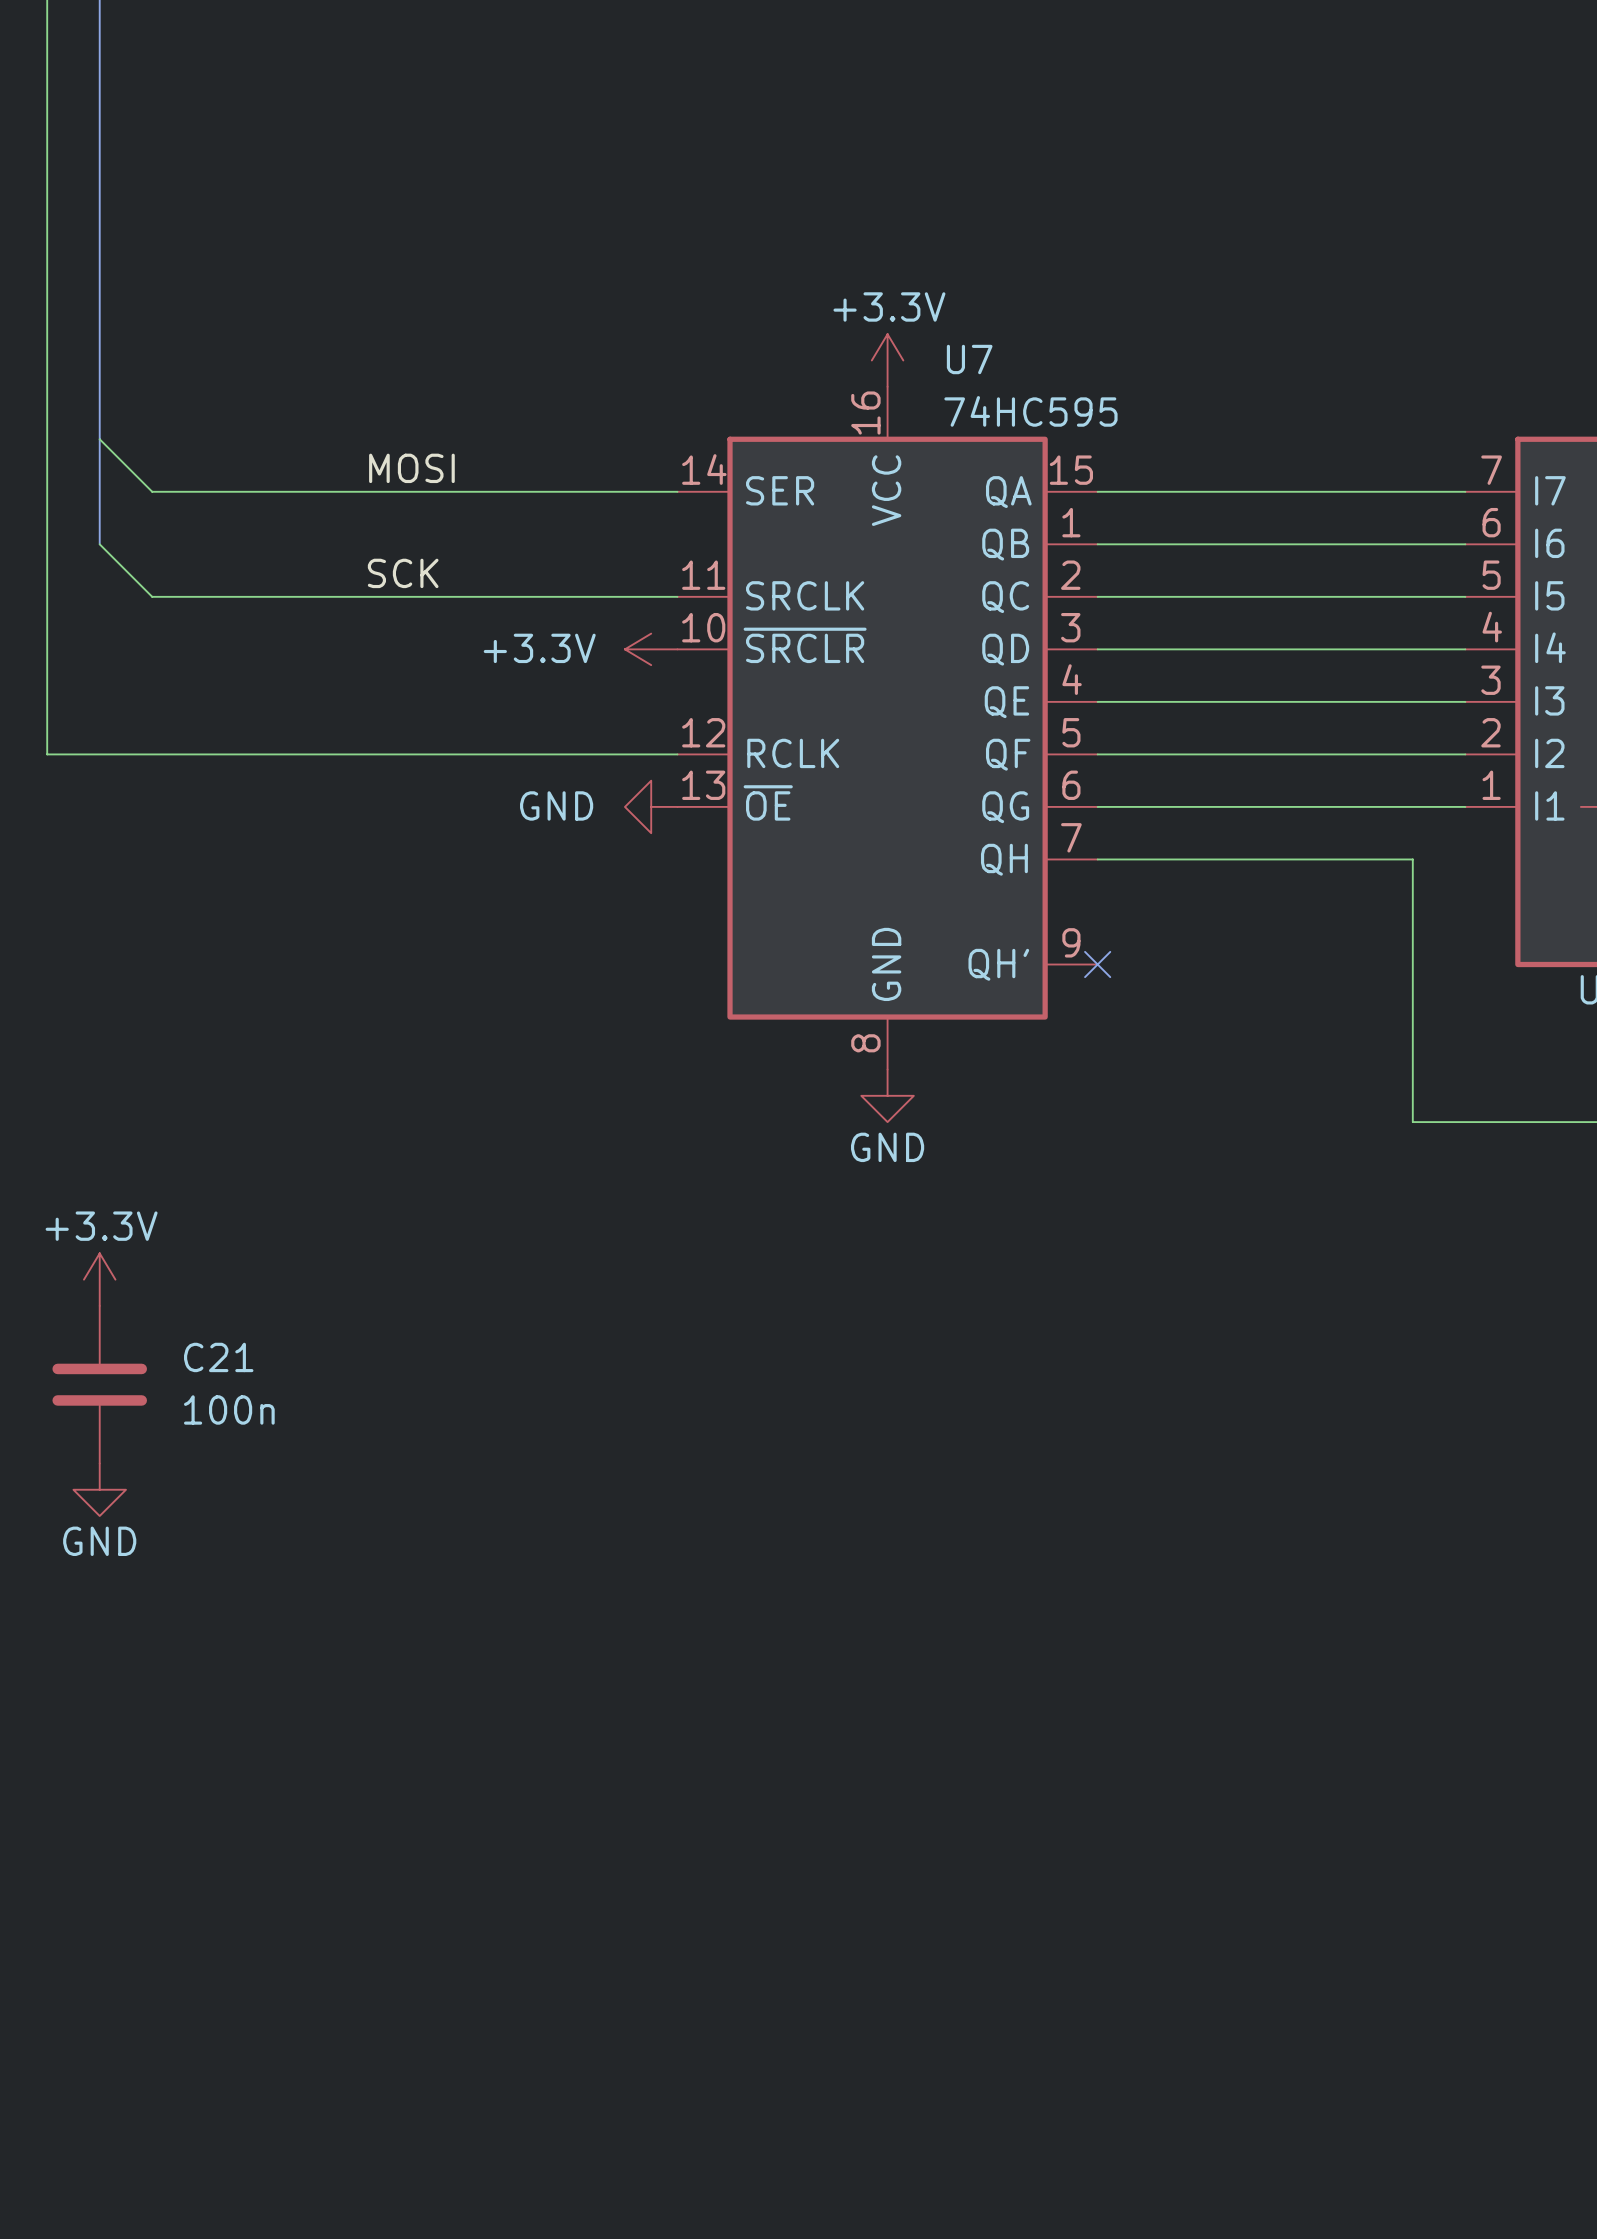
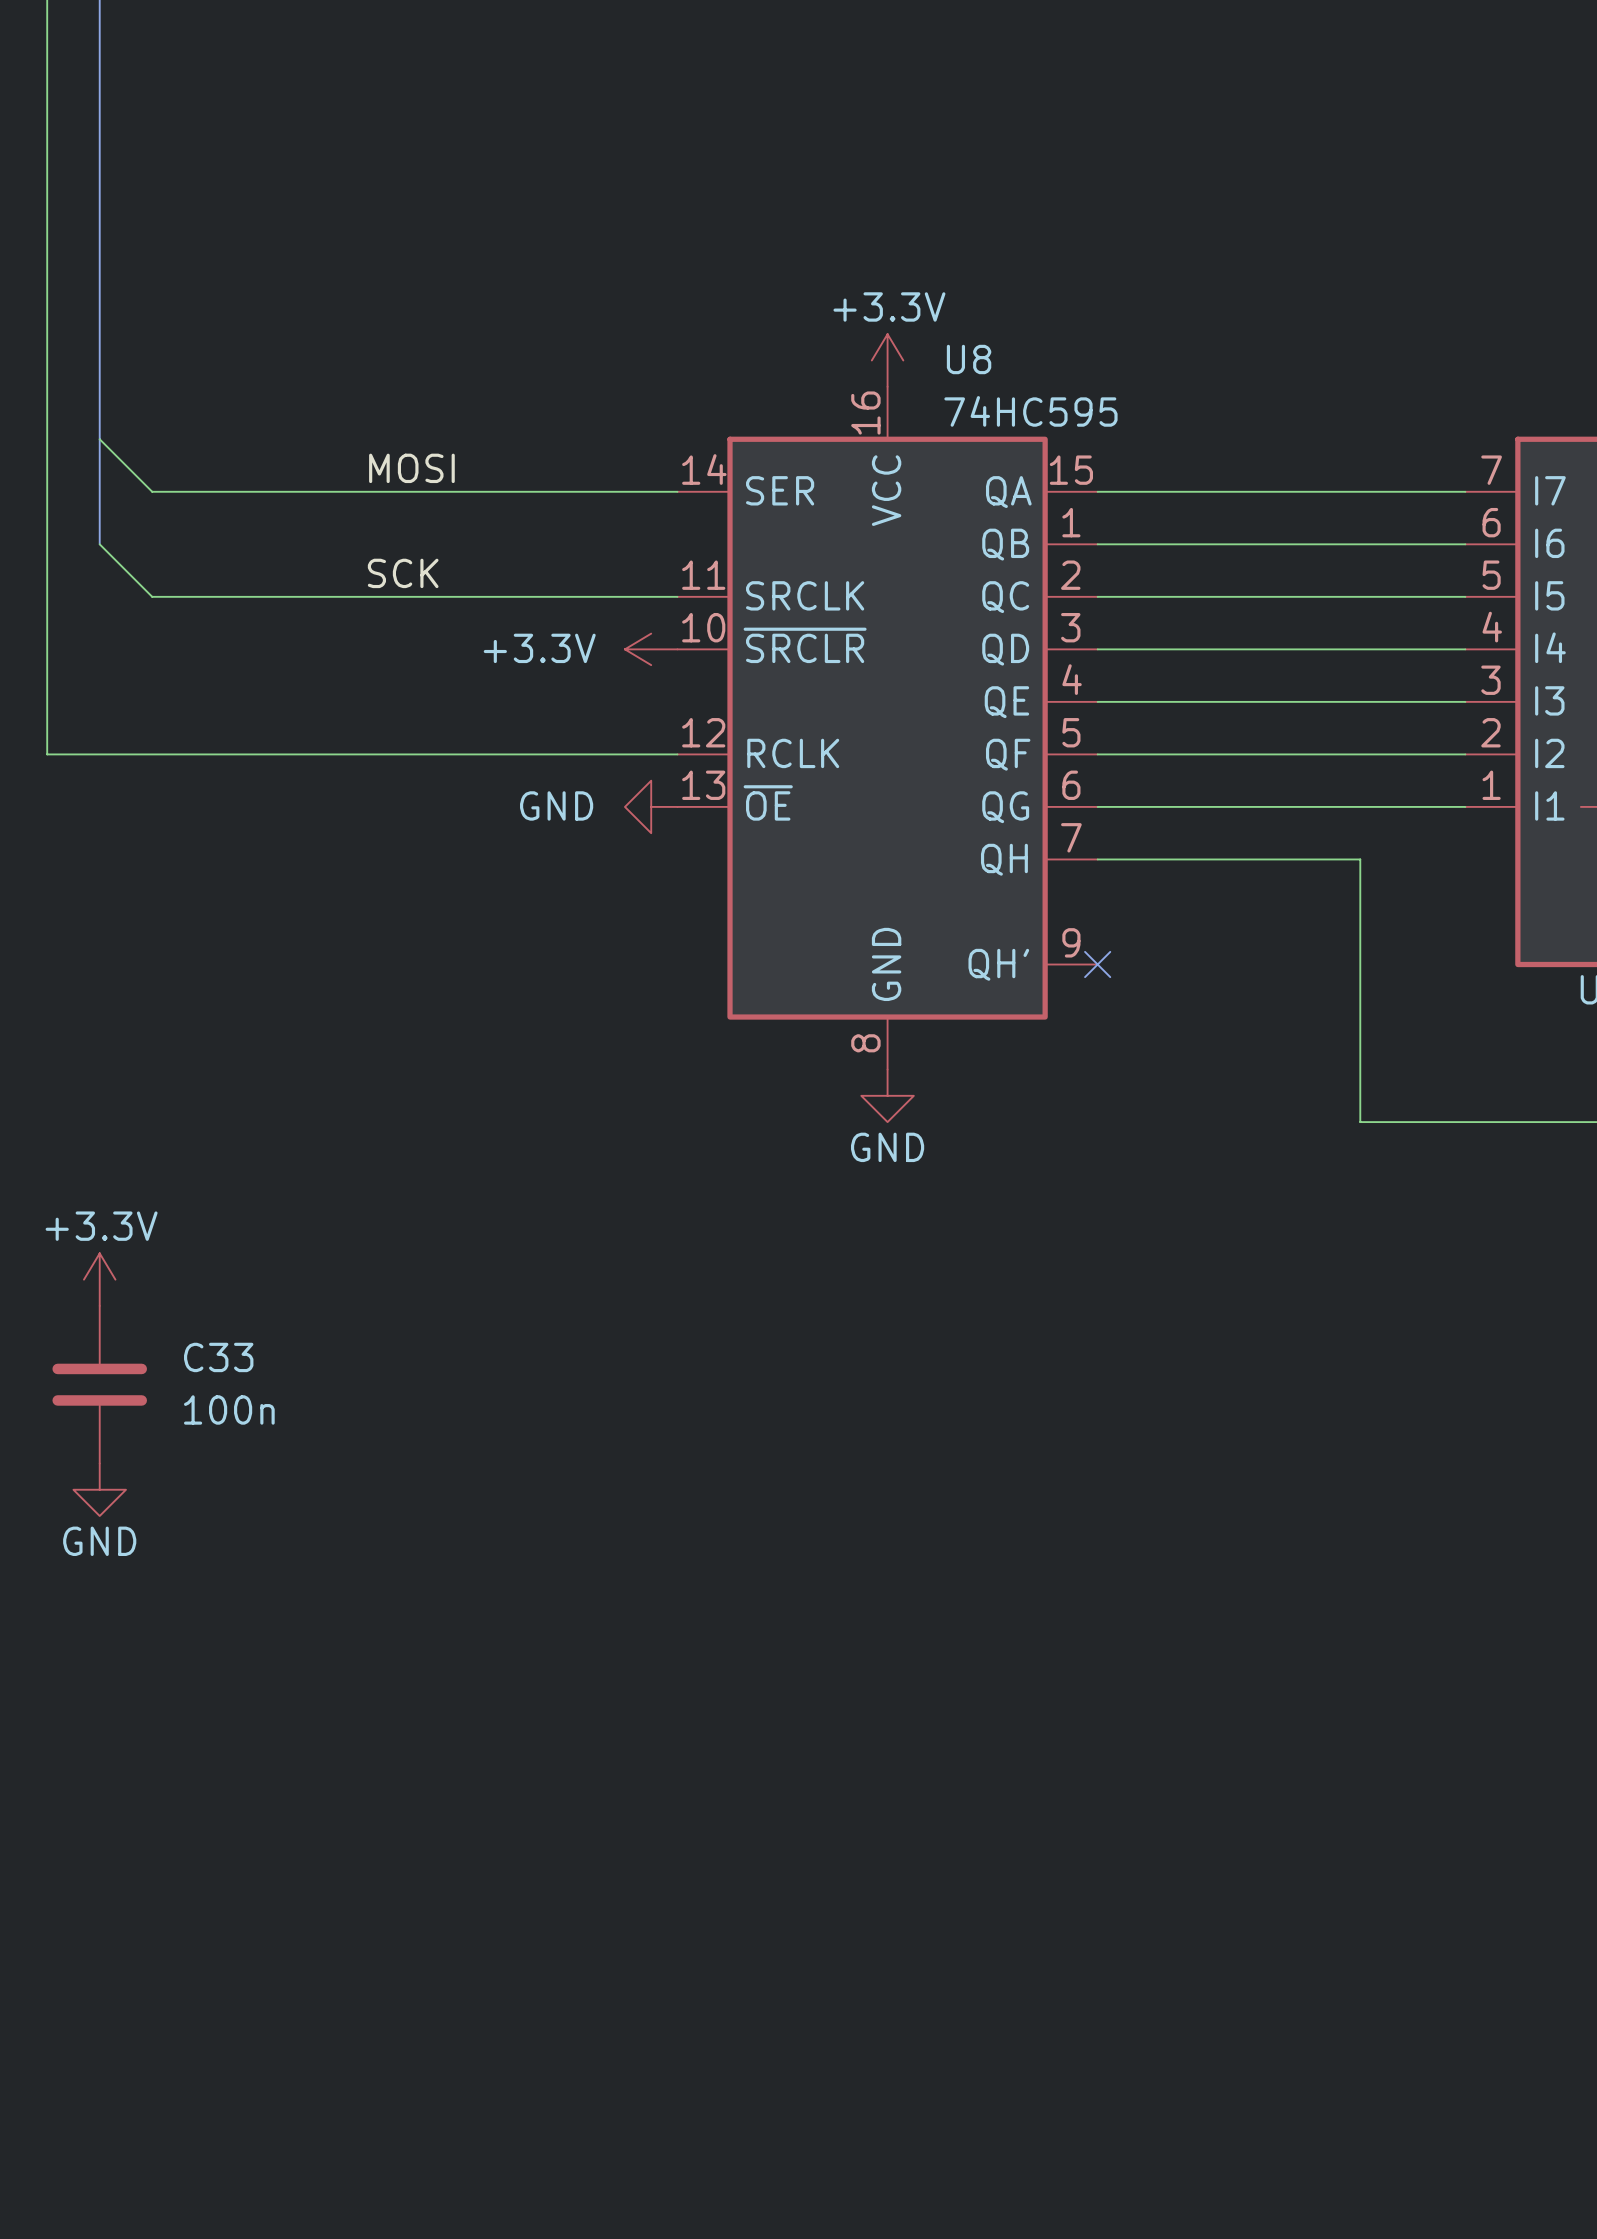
U7 name: U7 (969, 359) -> U8 (969, 359)
wire: (1360, 859) (1412, 859) (1412, 1122) -> (1360, 859) (1360, 1122) (1412, 1122)
C21 name: C21 (218, 1357) -> C33 (218, 1357)

